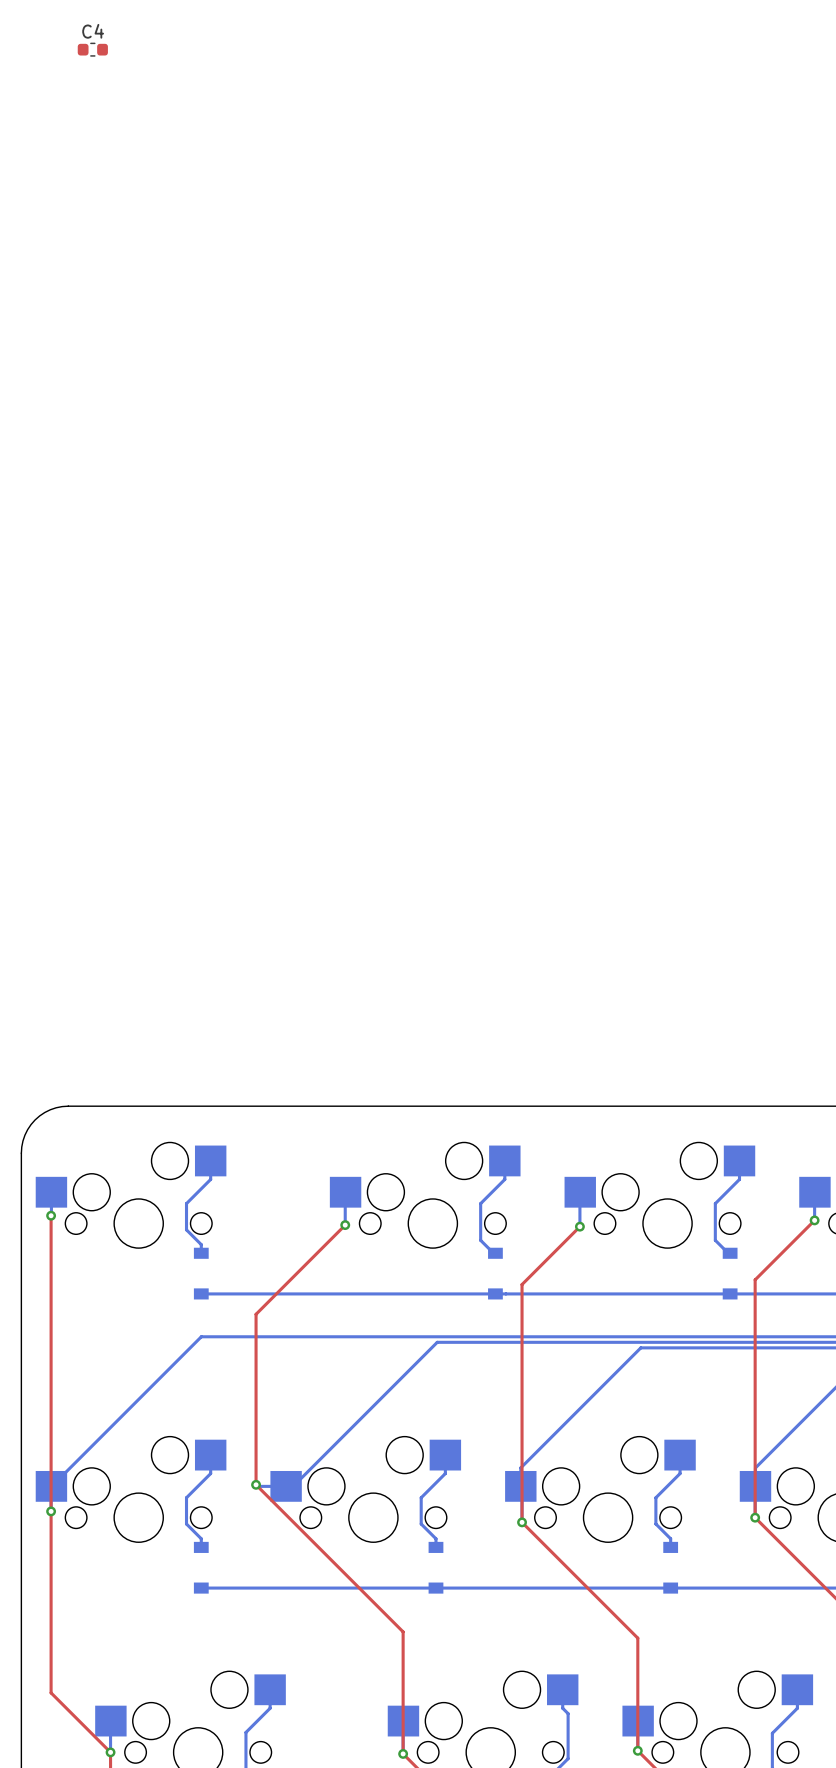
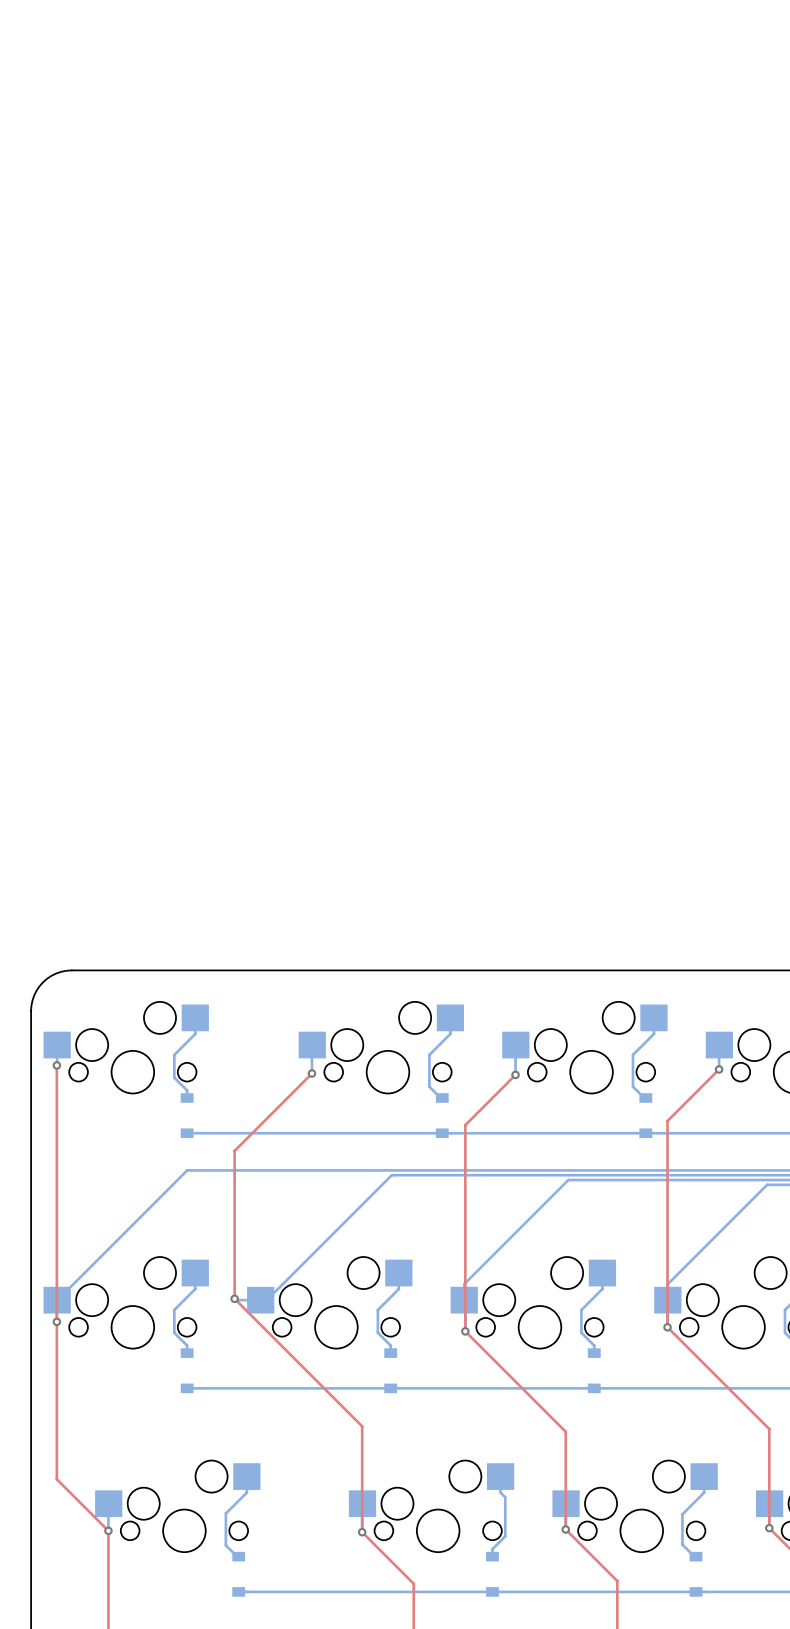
C4: (92, 49) -> none

